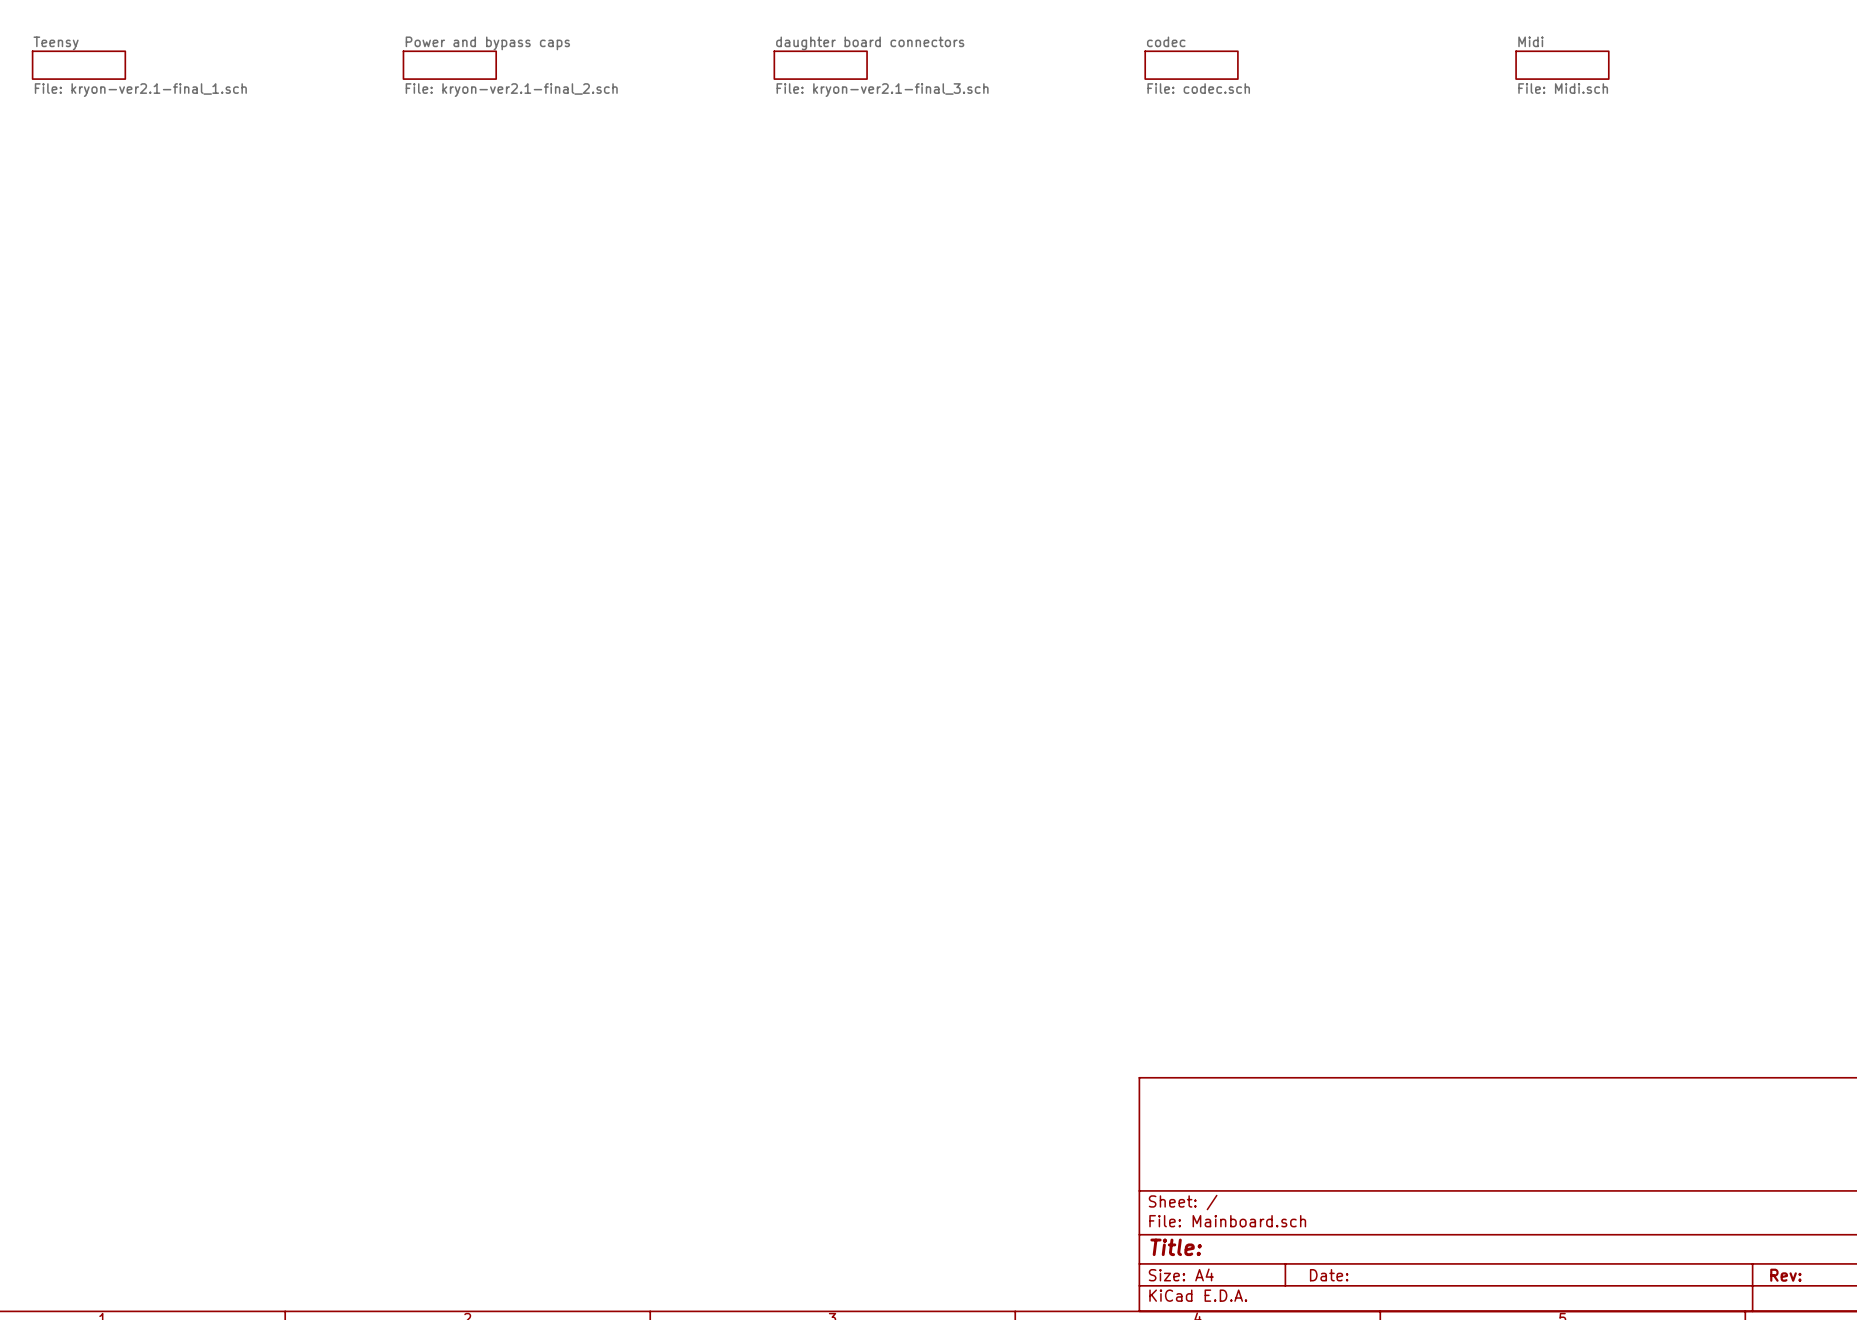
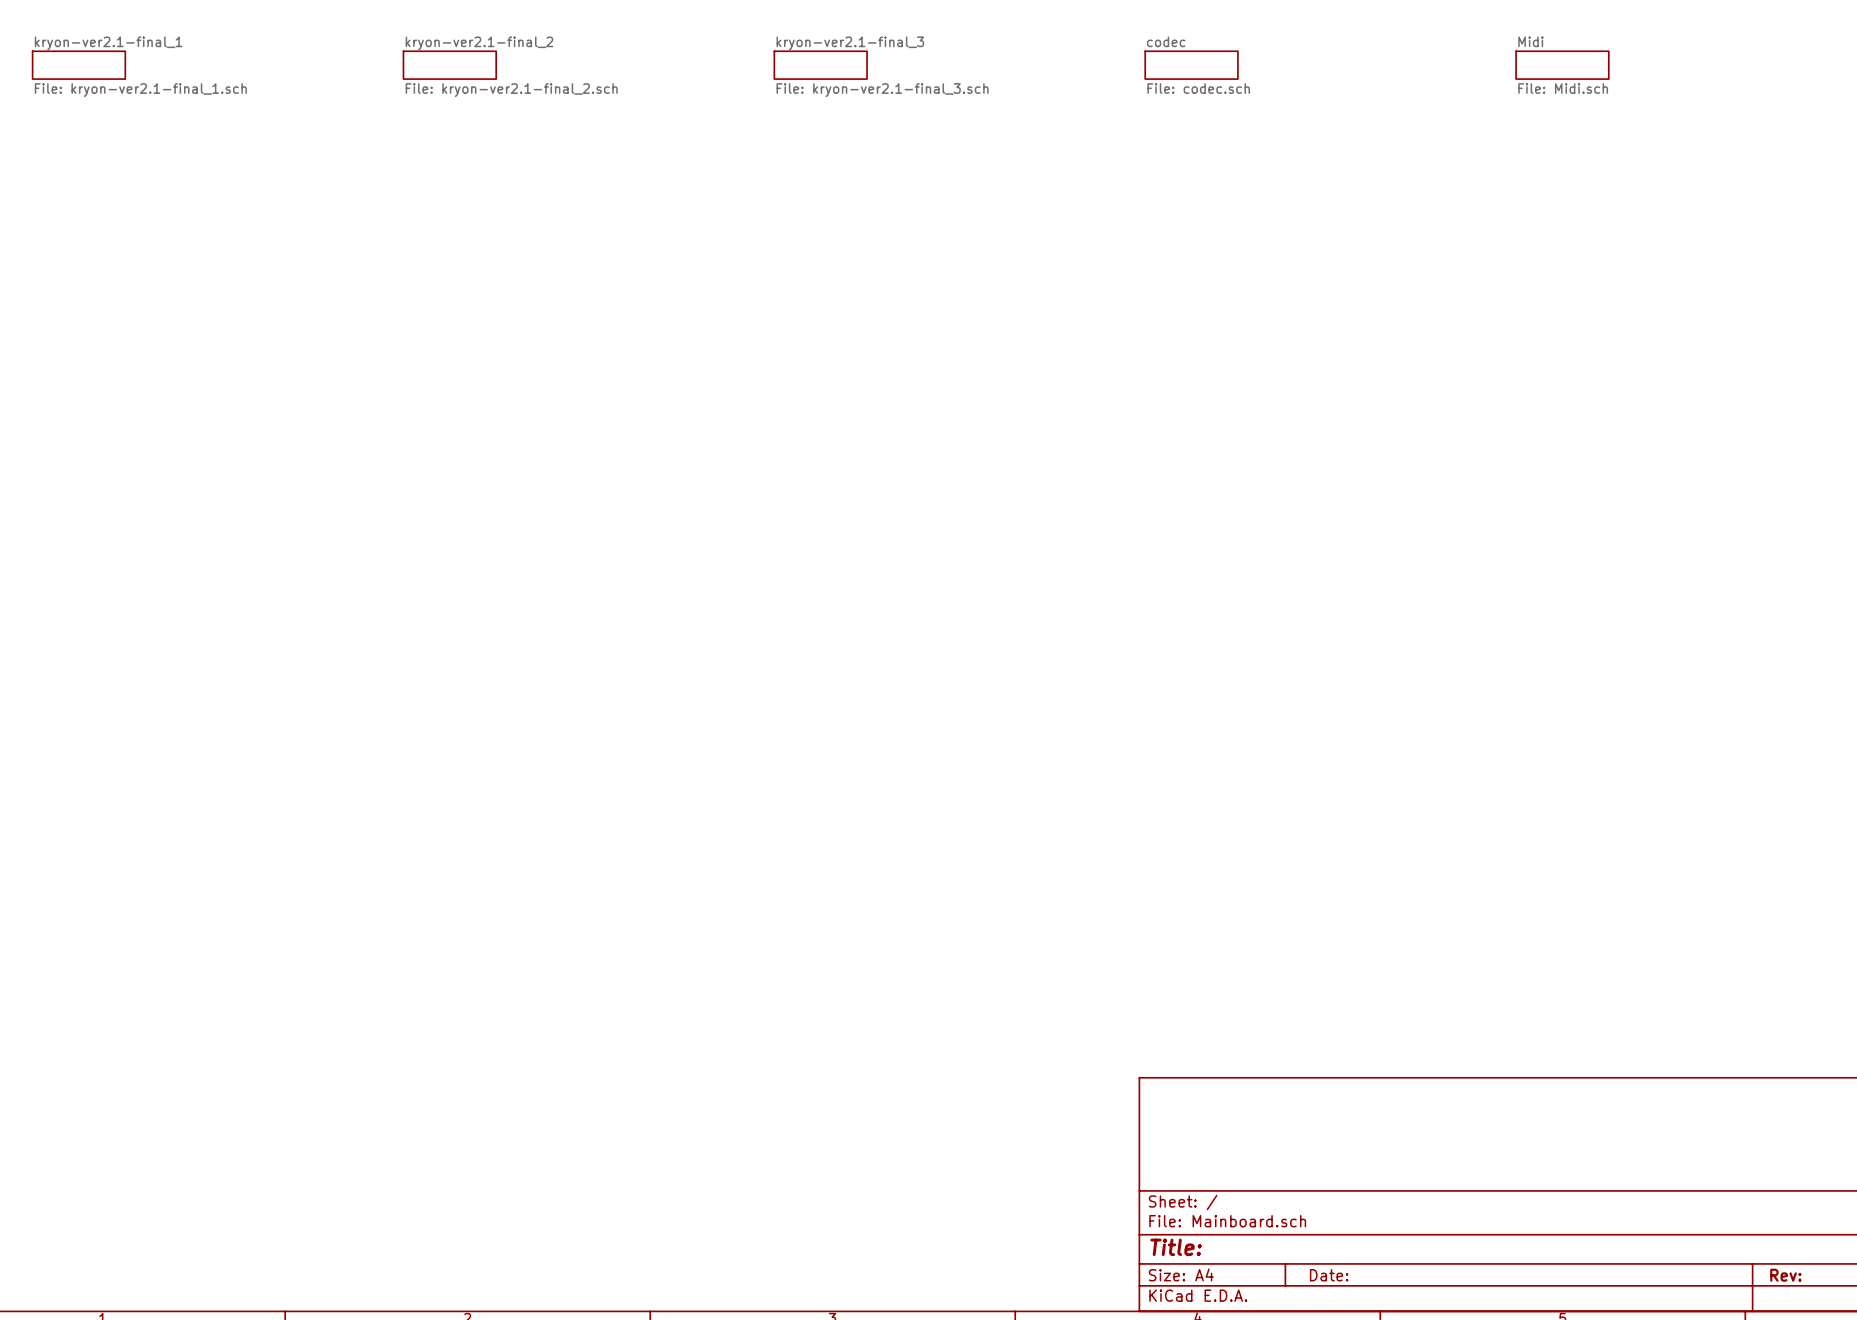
sheet Teensy name: Teensy (56, 43) -> kryon-ver2.1-final_1 (108, 43)
sheet Power and bypass caps name: Power and bypass caps (487, 43) -> kryon-ver2.1-final_2 (479, 43)
sheet daughter board connectors name: daughter board connectors (870, 43) -> kryon-ver2.1-final_3 (850, 43)

